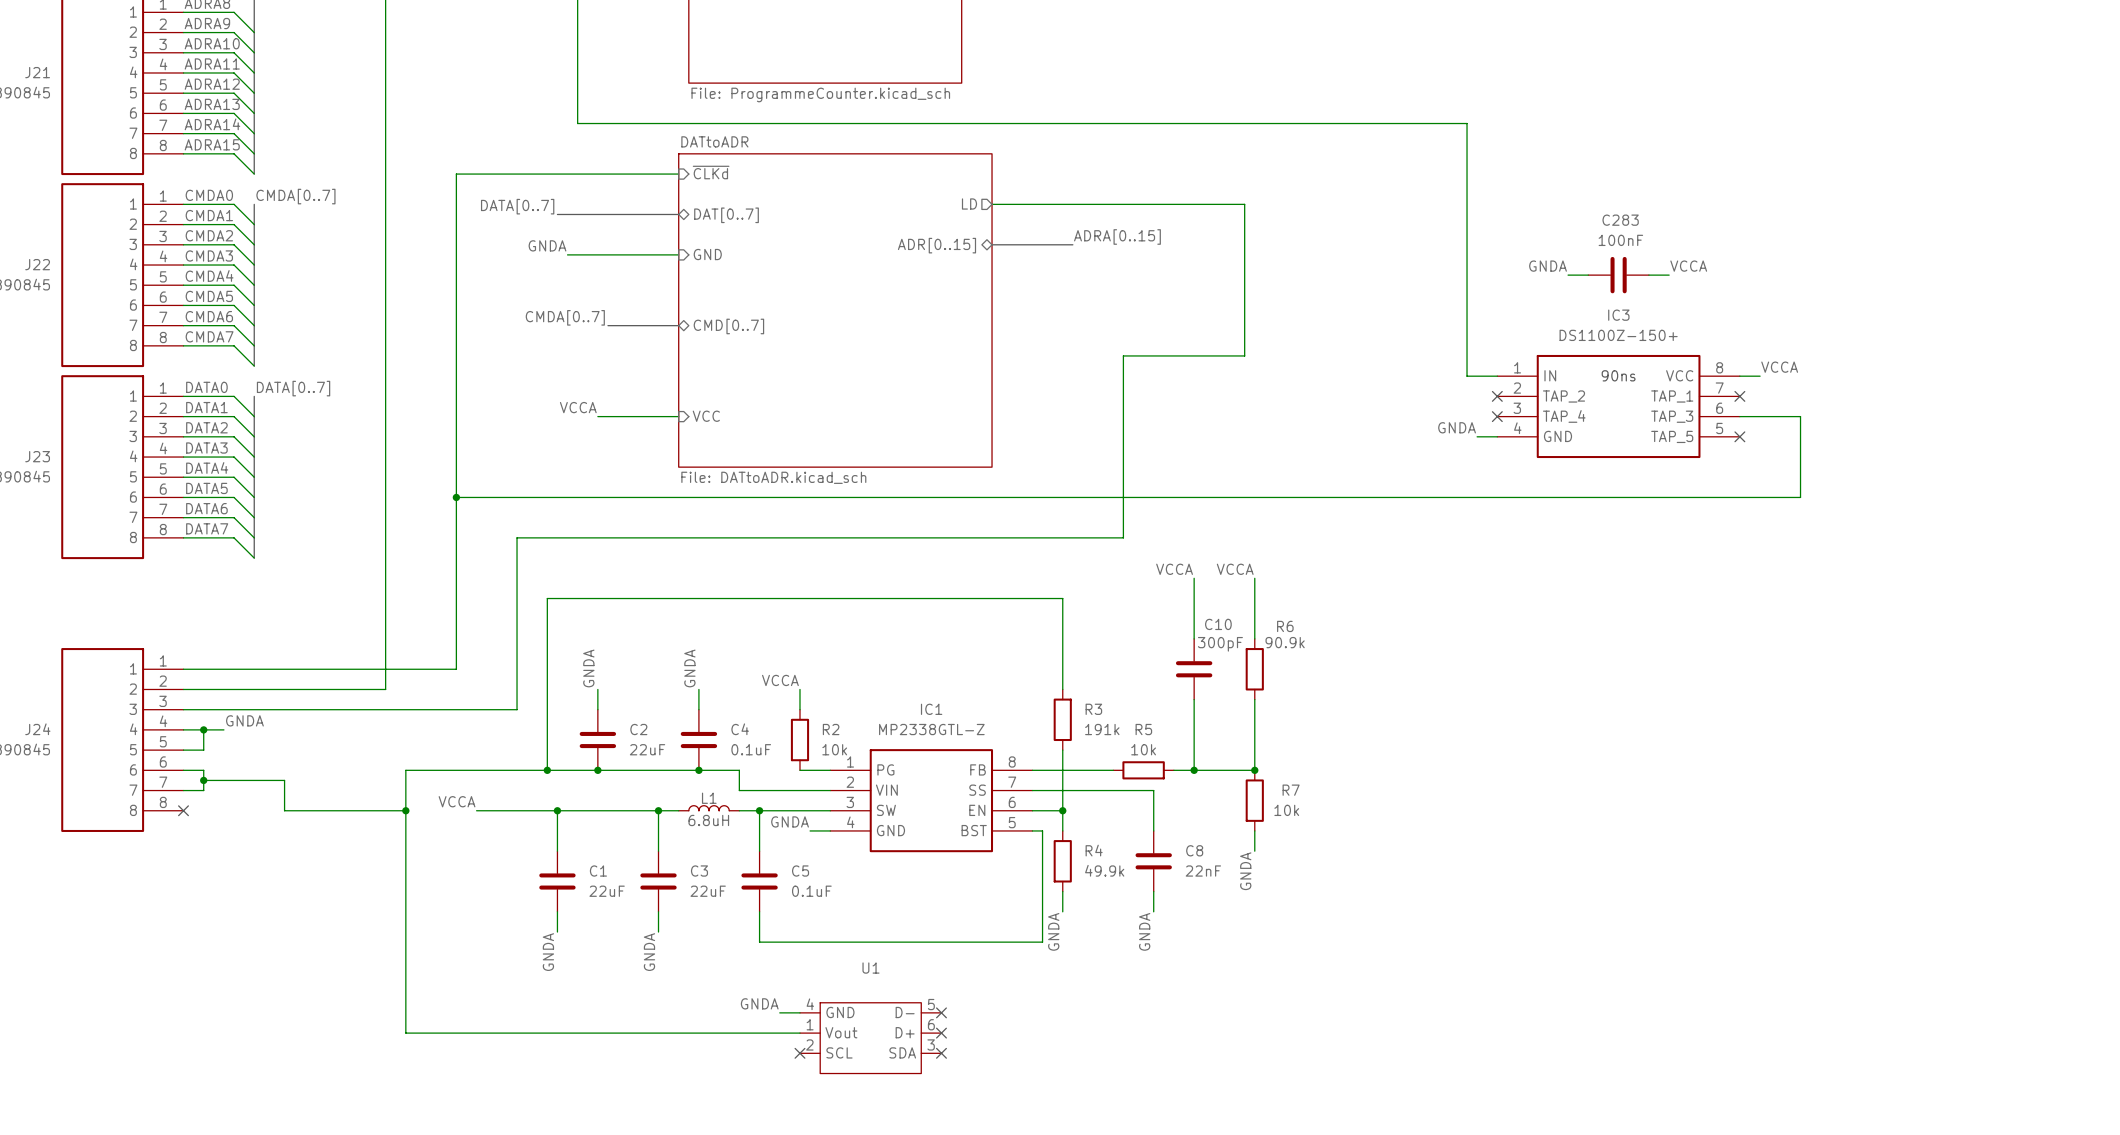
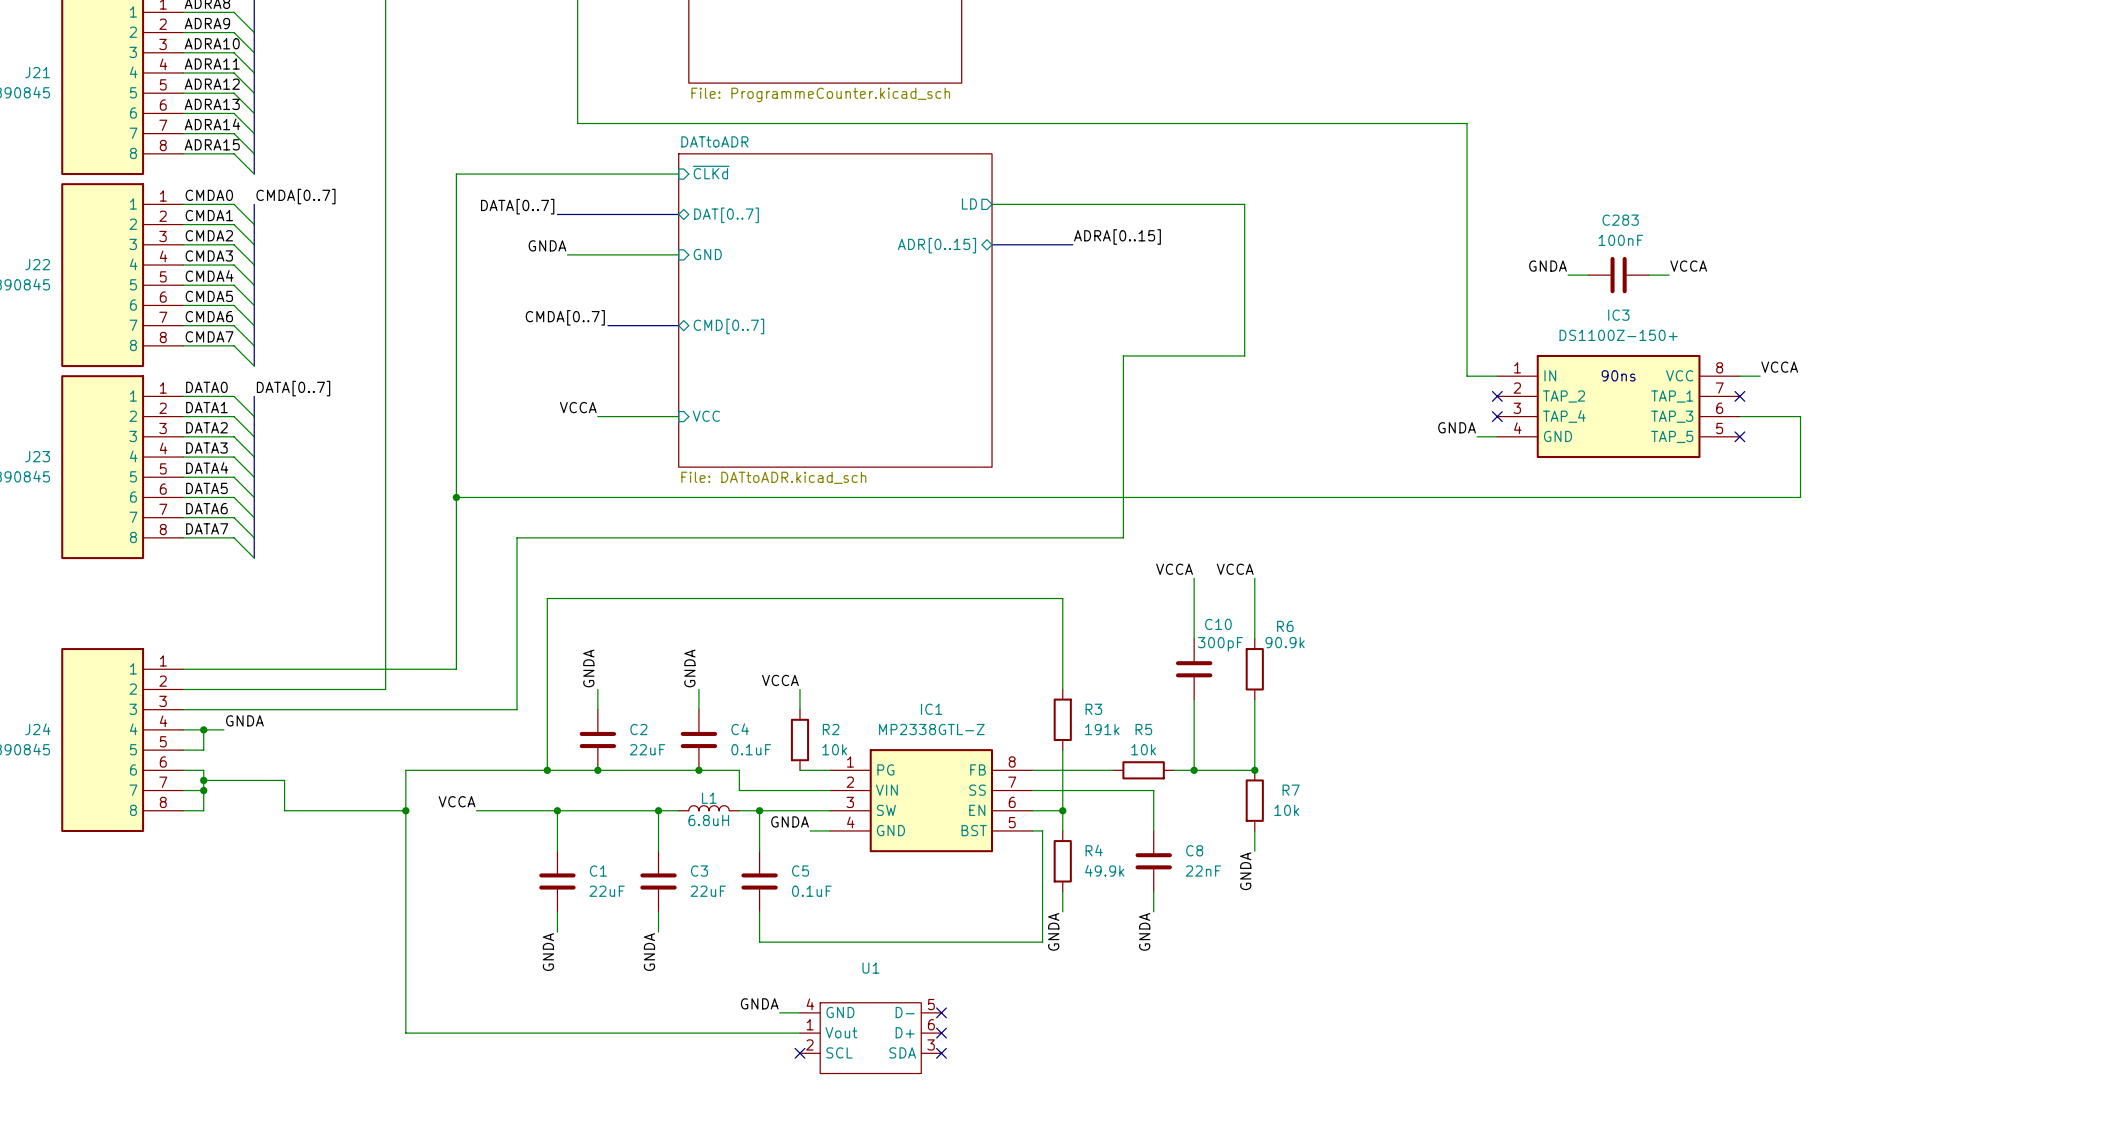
wire: none -> (203, 790) (203, 810) (183, 810)
junction: none -> (203, 790)
no-connect mark: (183, 810) -> none

